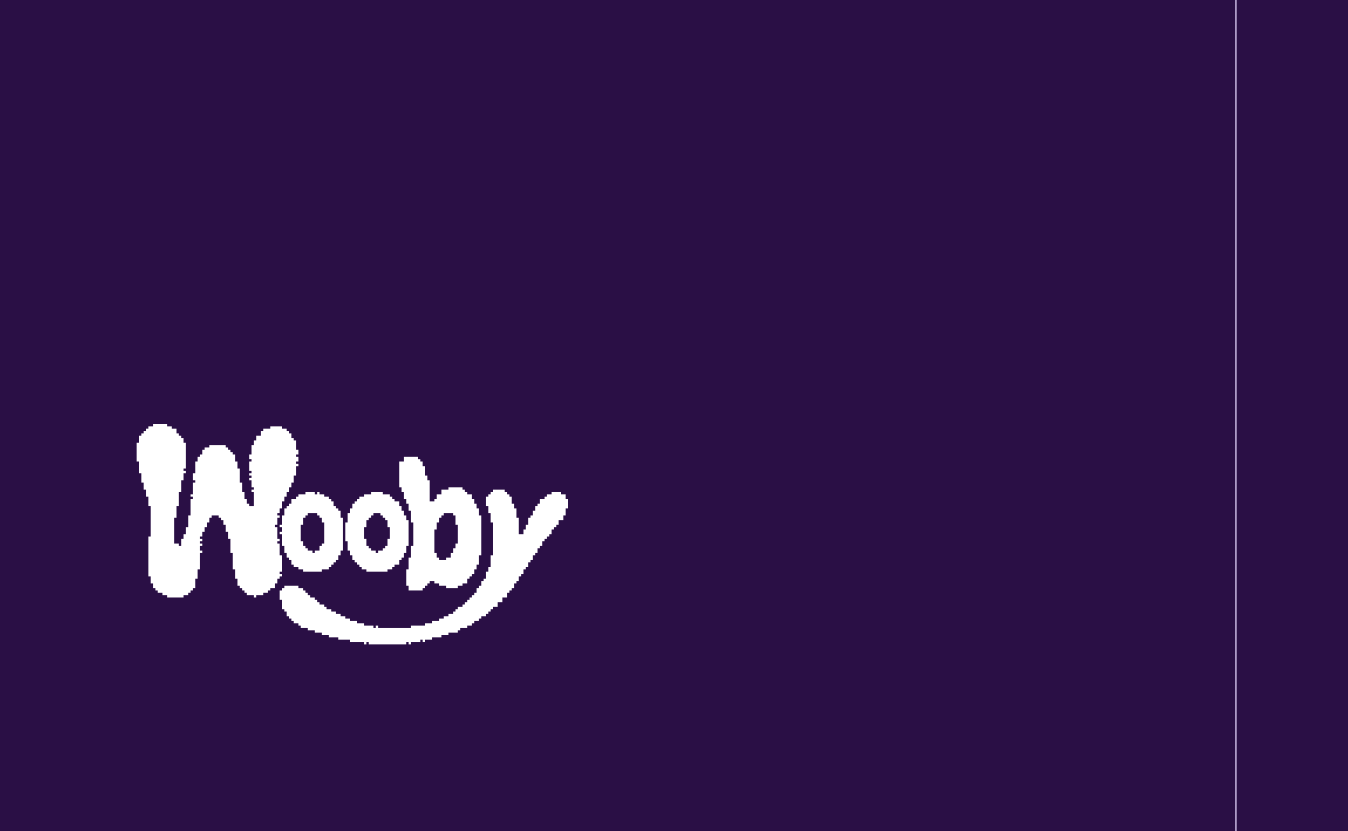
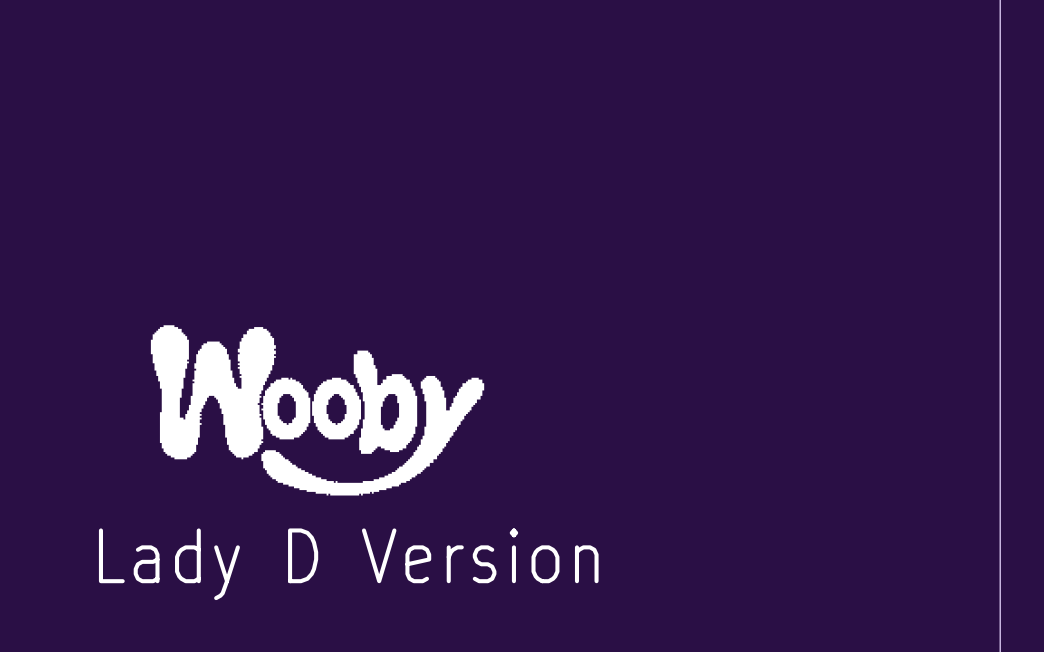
text: none -> Lady D Version (348, 564)

